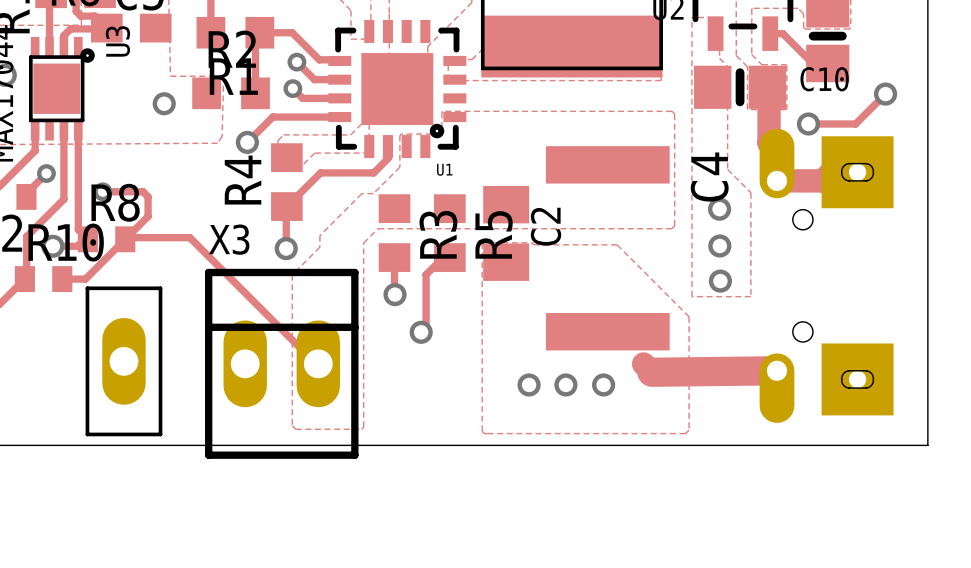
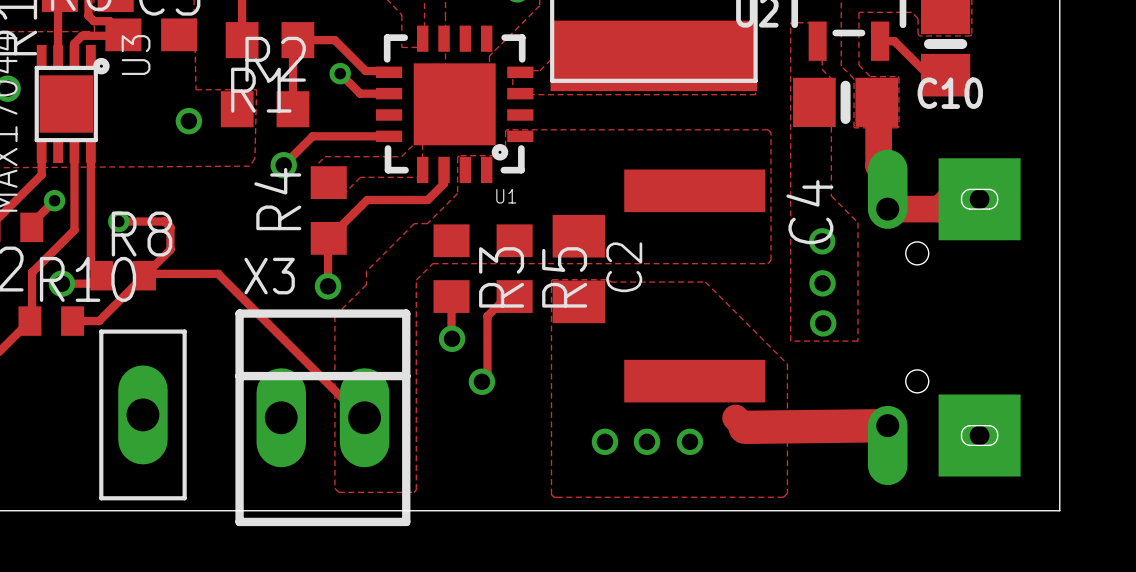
track: (292, 88) (302, 98) (339, 98) -> none
via: (292, 88) -> none
track: (885, 94) (855, 124) (808, 124) -> none
via: (885, 94) -> none
via: (808, 124) -> none

